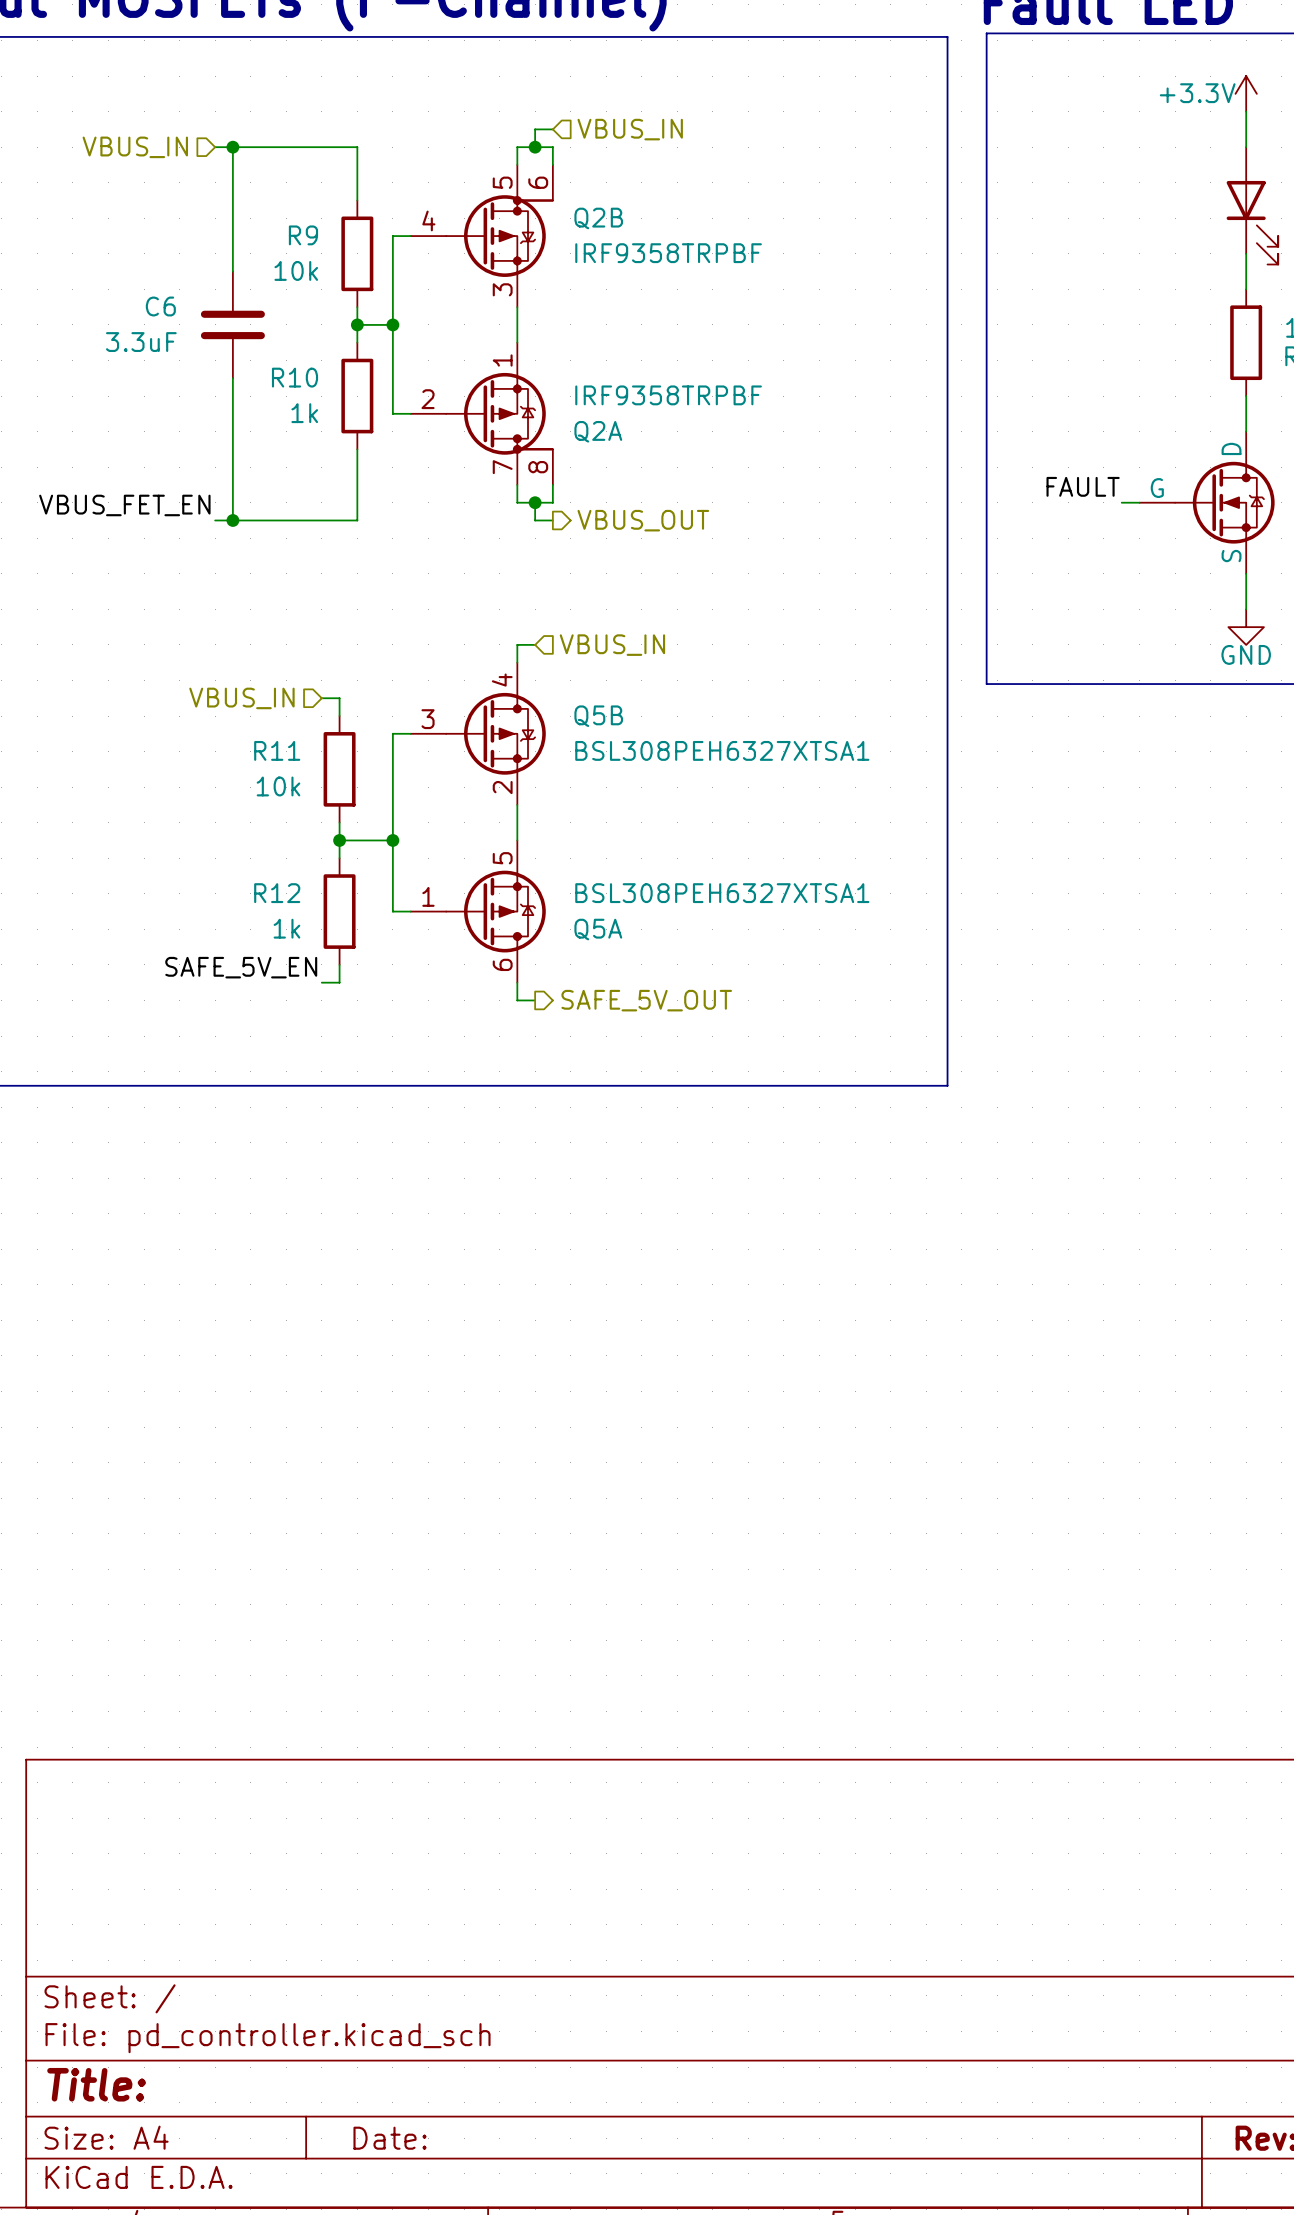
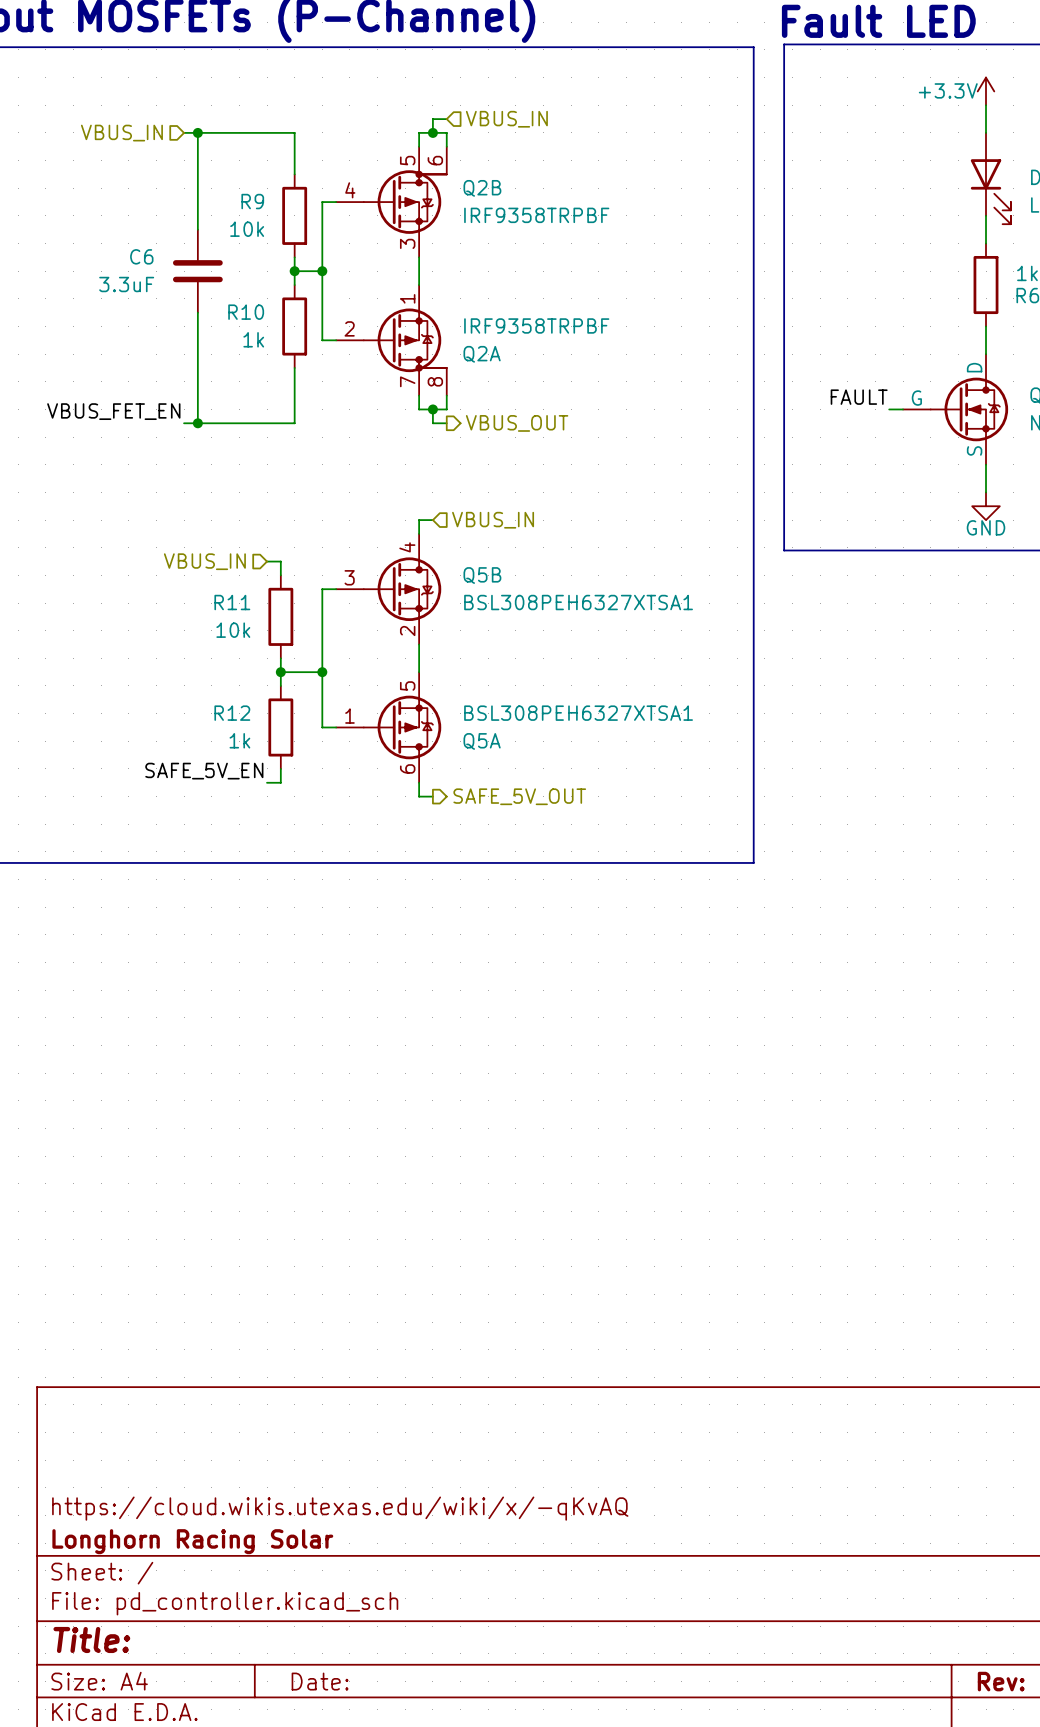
title block: none -> https://cloud.wikis.utexas.edu/wiki/x/-qKvAQ (340, 1508)
title block: none -> Longhorn Racing Solar (192, 1541)

